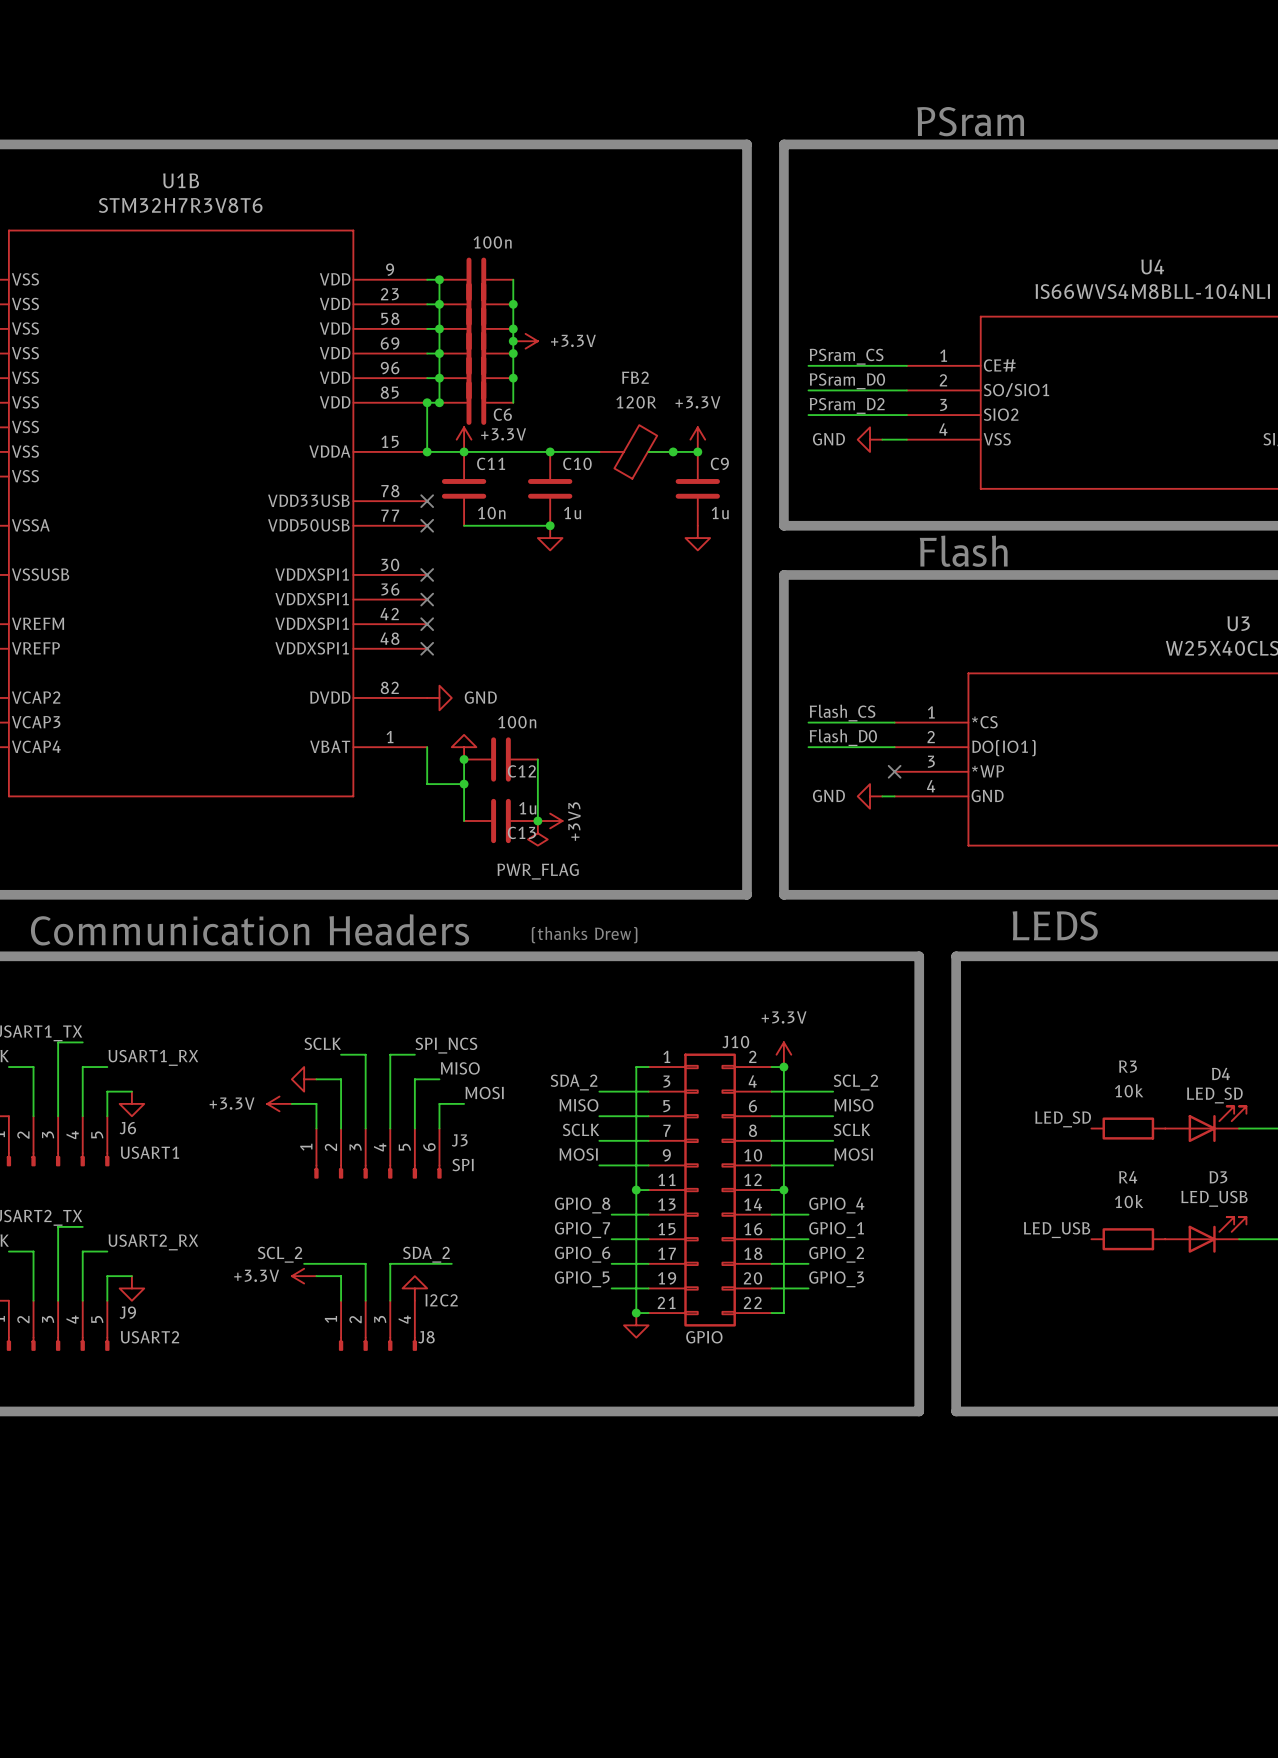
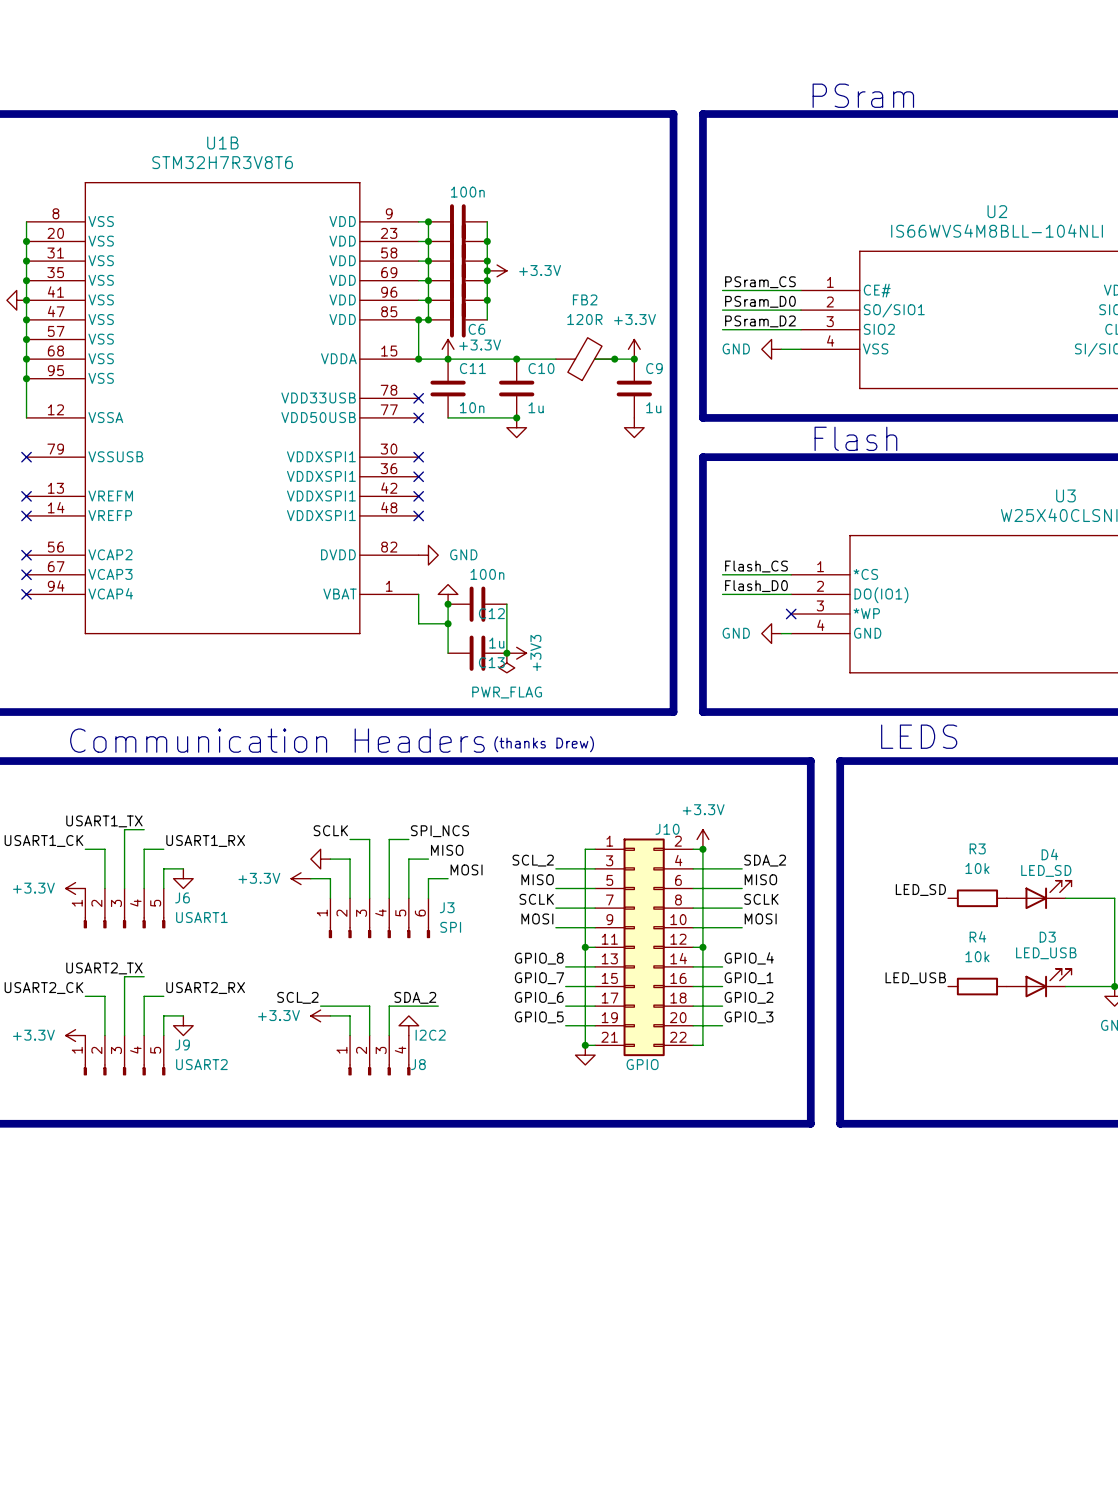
U4 name: U4 (1152, 266) -> U2 (997, 211)
label: SDA_2 (574, 1082) -> SCL_2 (533, 860)
label: SCL_2 (855, 1082) -> SDA_2 (765, 860)

